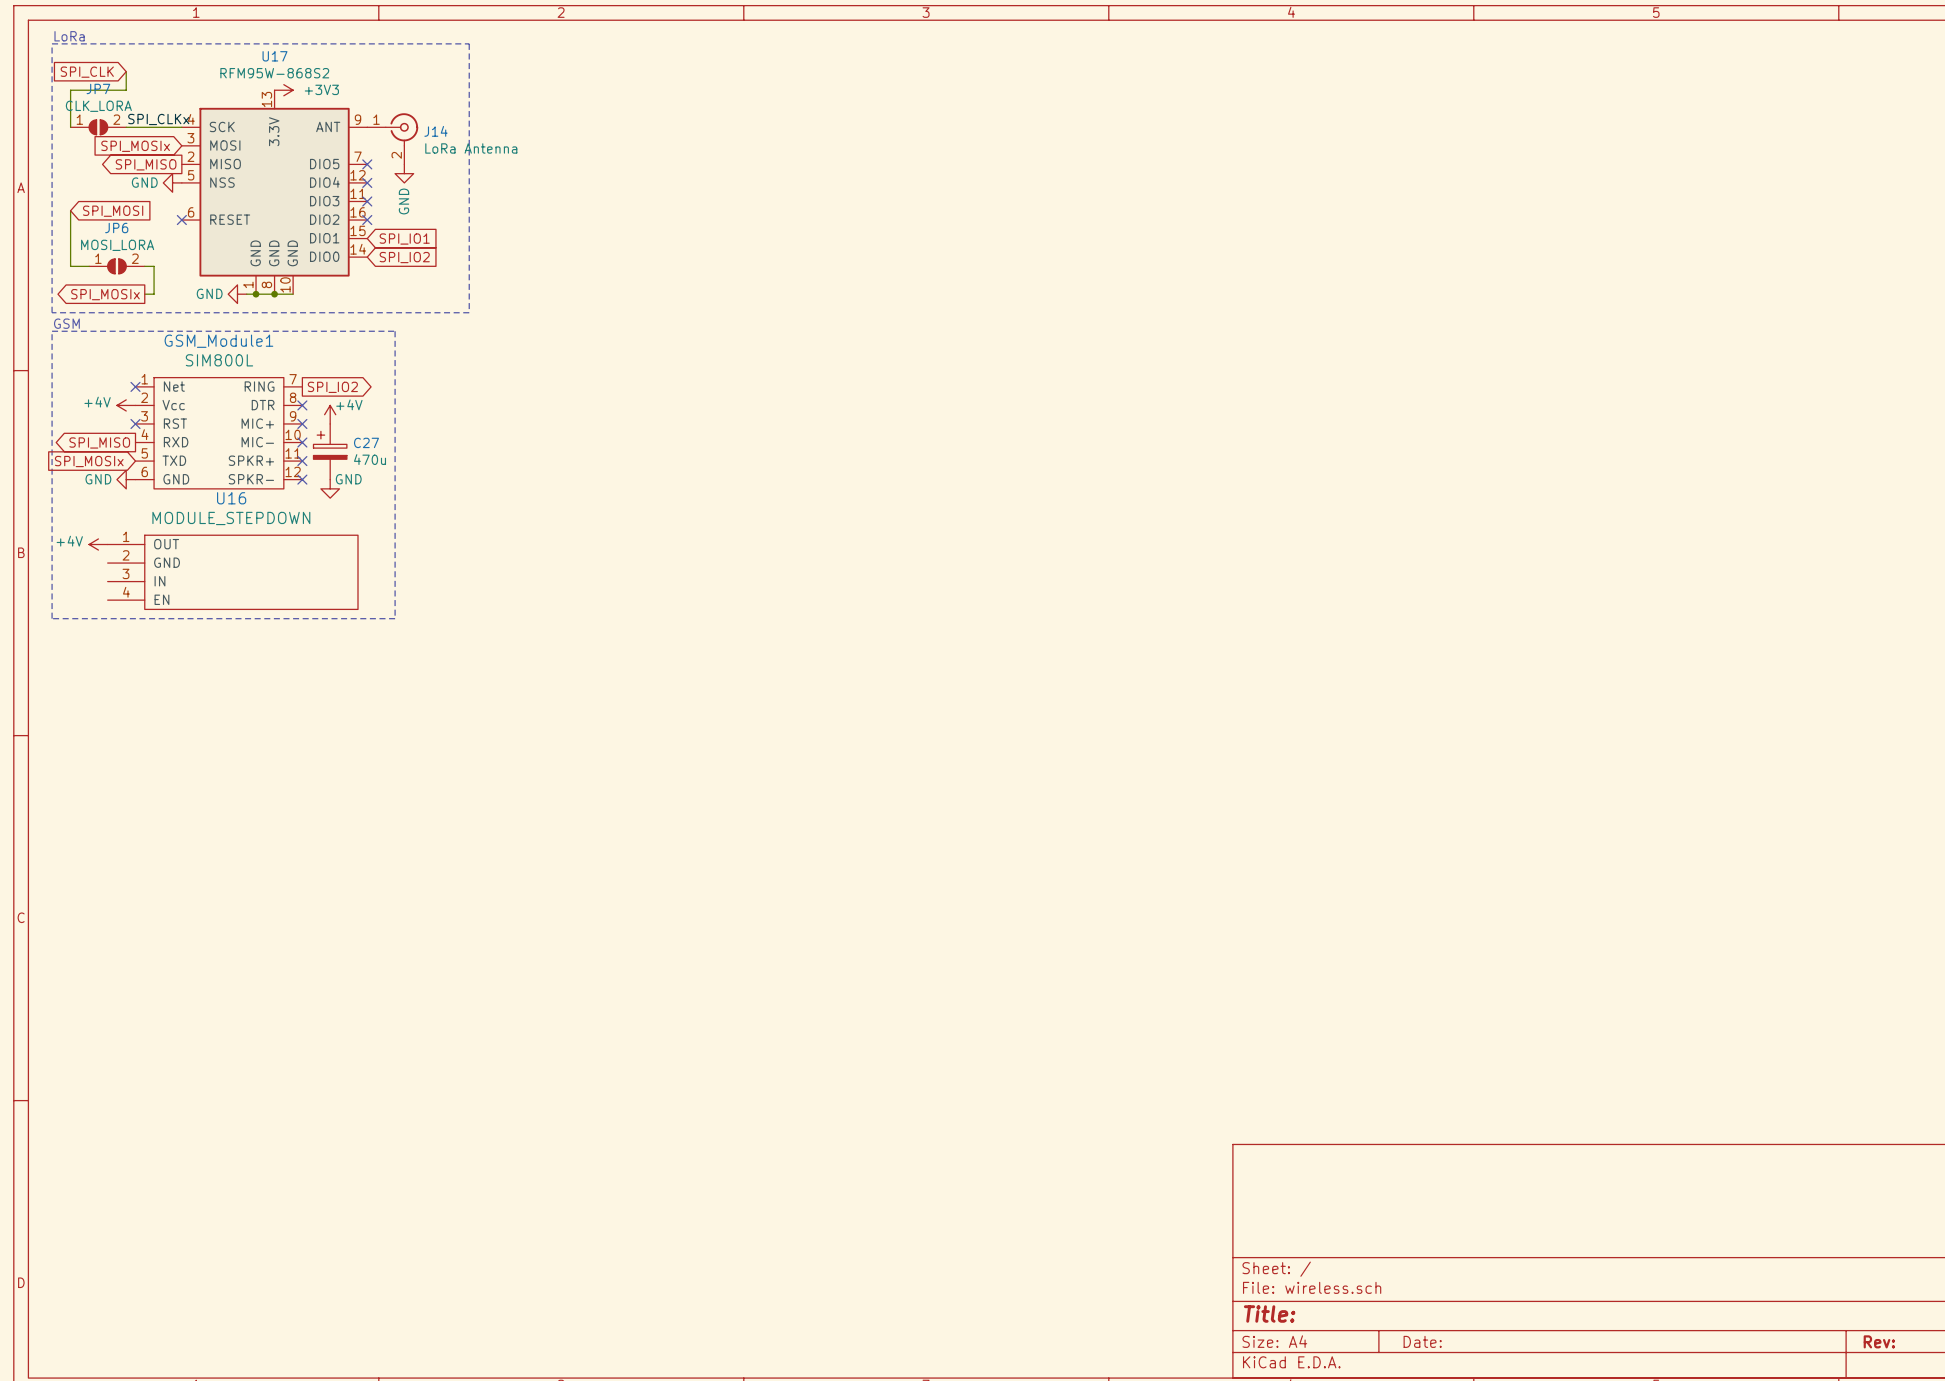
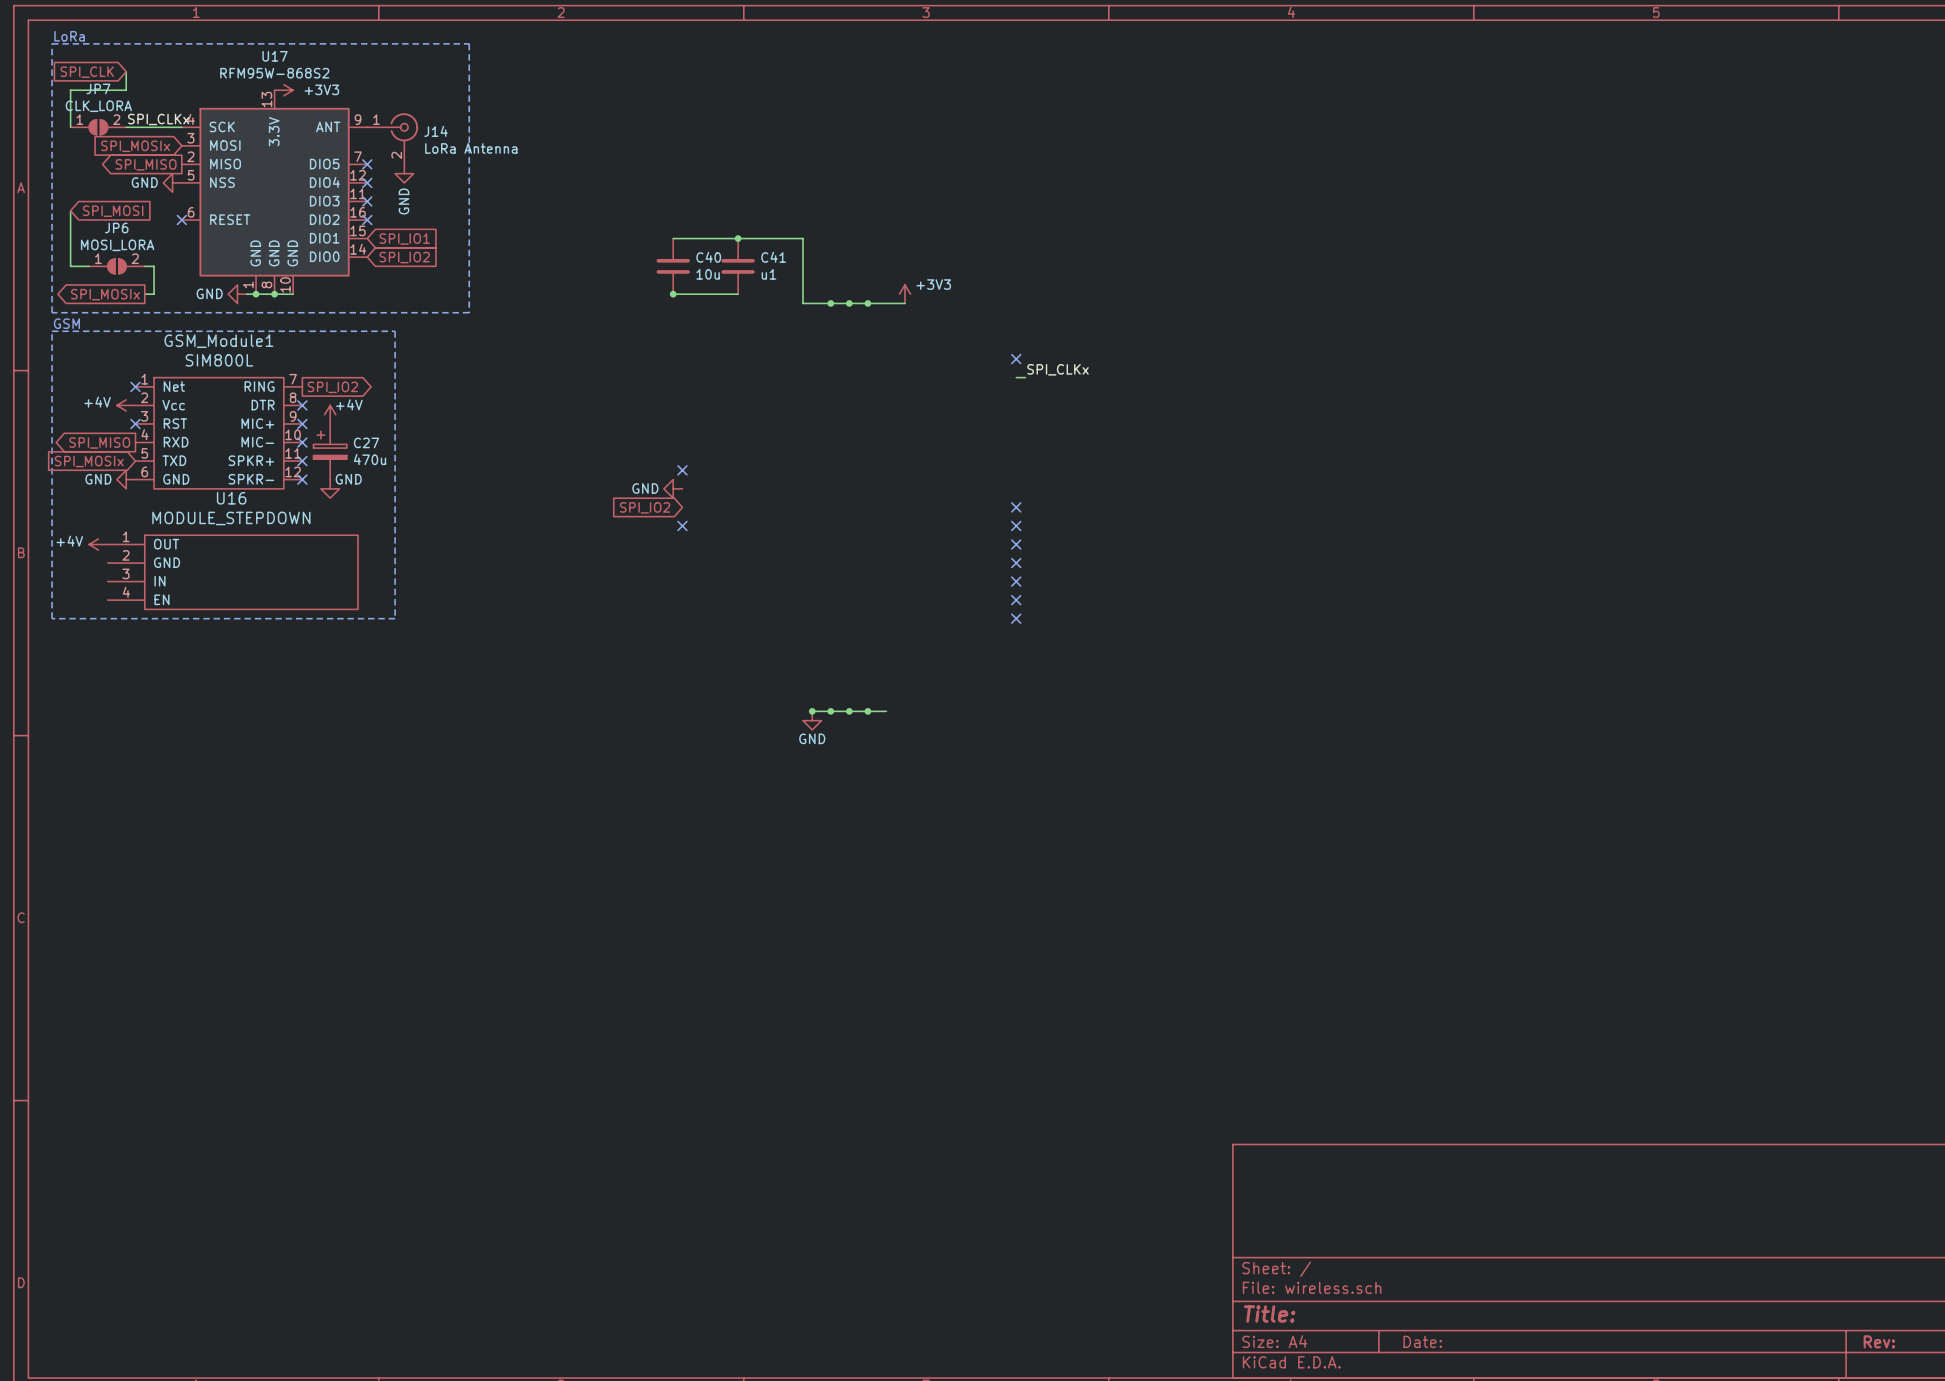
wire: none -> (673, 238) (803, 238) (803, 303) (904, 303)
junction: none -> (738, 238)
C40: none -> 10u (673, 266)
C41: none -> u1 (738, 266)
wire: none -> (673, 294) (738, 294)
junction: none -> (673, 294)
power symbol: none -> +3V3 (904, 294)
junction: none -> (830, 303)
junction: none -> (849, 303)
junction: none -> (867, 303)
no-connect mark: none -> (1016, 359)
label: none -> SPI_CLKx (1058, 369)
wire: none -> (1016, 377) (1025, 377)
no-connect mark: none -> (682, 470)
power symbol: none -> GND (673, 488)
global label: none -> SPI_IO2 (645, 507)
no-connect mark: none -> (1016, 507)
no-connect mark: none -> (682, 525)
no-connect mark: none -> (1016, 525)
no-connect mark: none -> (1016, 544)
no-connect mark: none -> (1016, 563)
no-connect mark: none -> (1016, 581)
no-connect mark: none -> (1016, 600)
no-connect mark: none -> (1016, 618)
wire: none -> (812, 711) (886, 711)
junction: none -> (812, 711)
junction: none -> (830, 711)
junction: none -> (849, 711)
junction: none -> (867, 711)
power symbol: none -> GND (812, 720)

